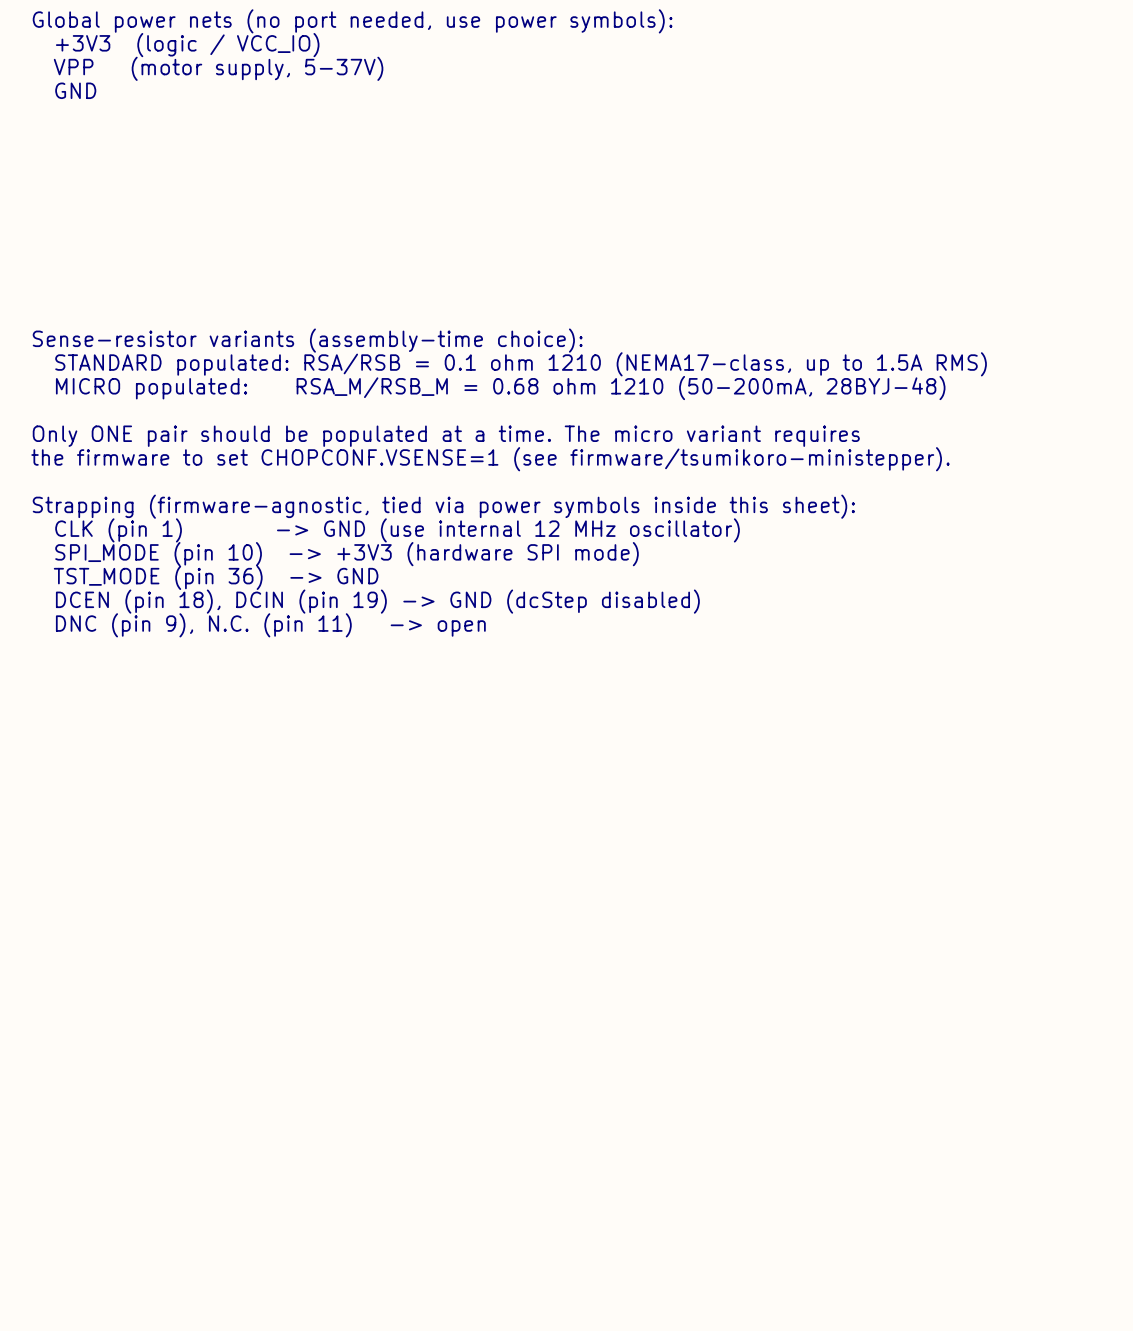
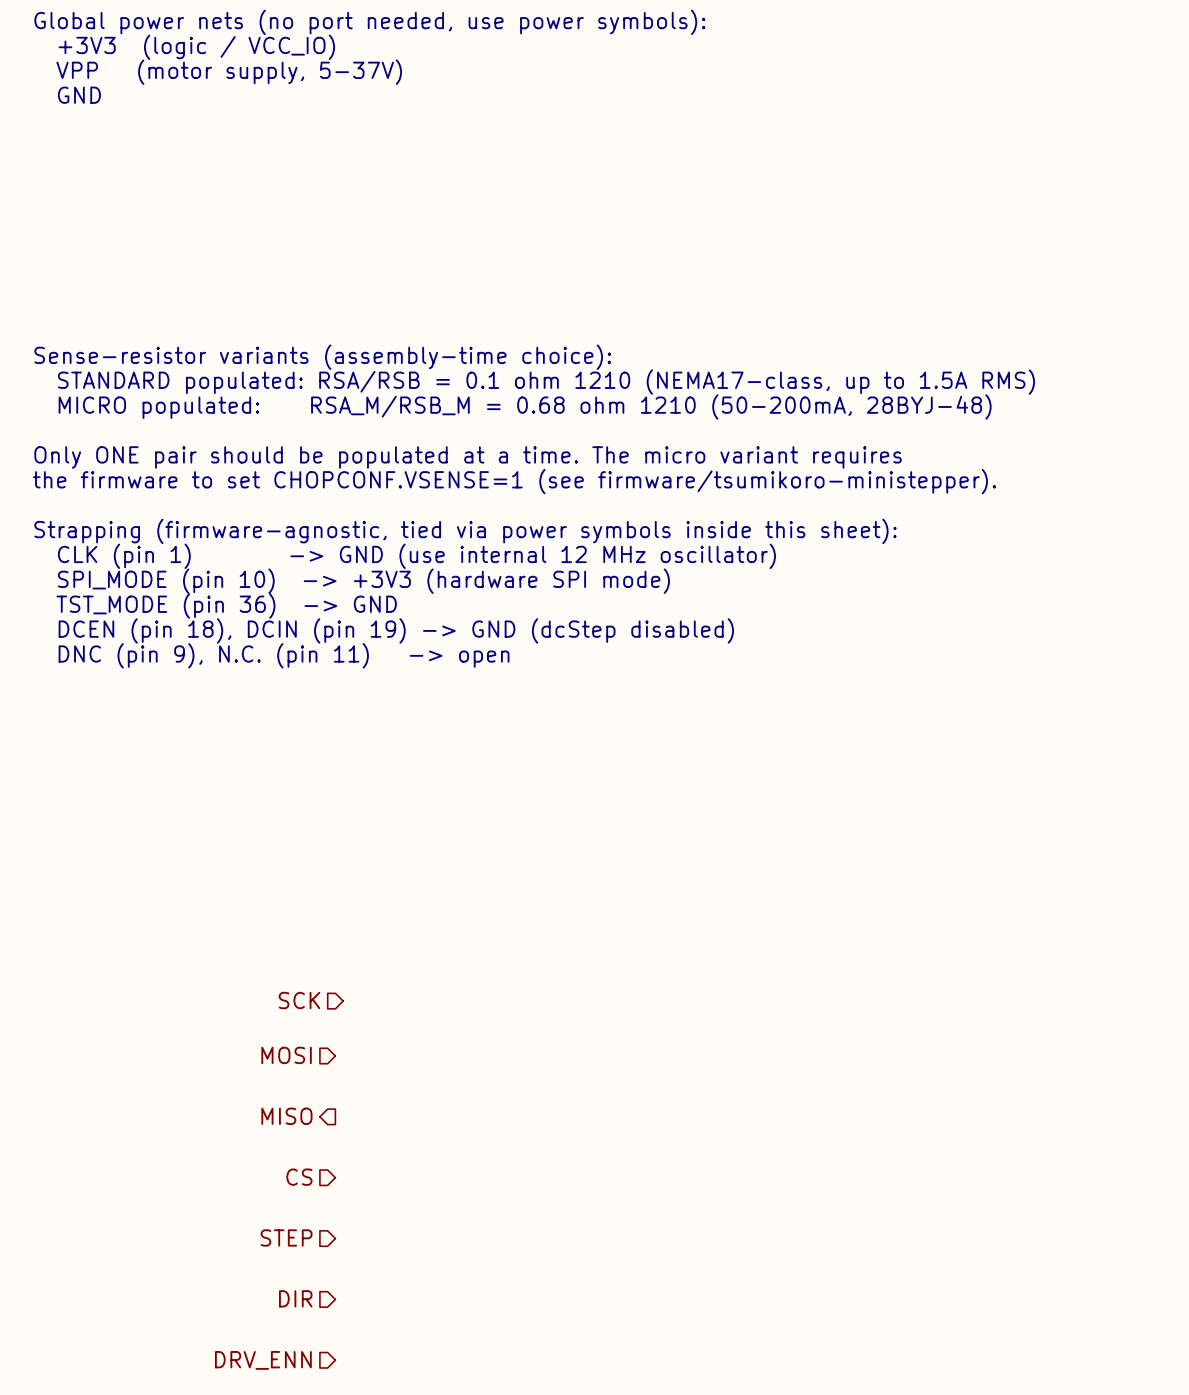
hierarchical label: none -> SCK (299, 1000)
hierarchical label: none -> MOSI (286, 1055)
hierarchical label: none -> MISO (286, 1116)
hierarchical label: none -> CS (299, 1177)
hierarchical label: none -> STEP (286, 1237)
hierarchical label: none -> DIR (295, 1298)
hierarchical label: none -> DRV_ENN (263, 1360)

